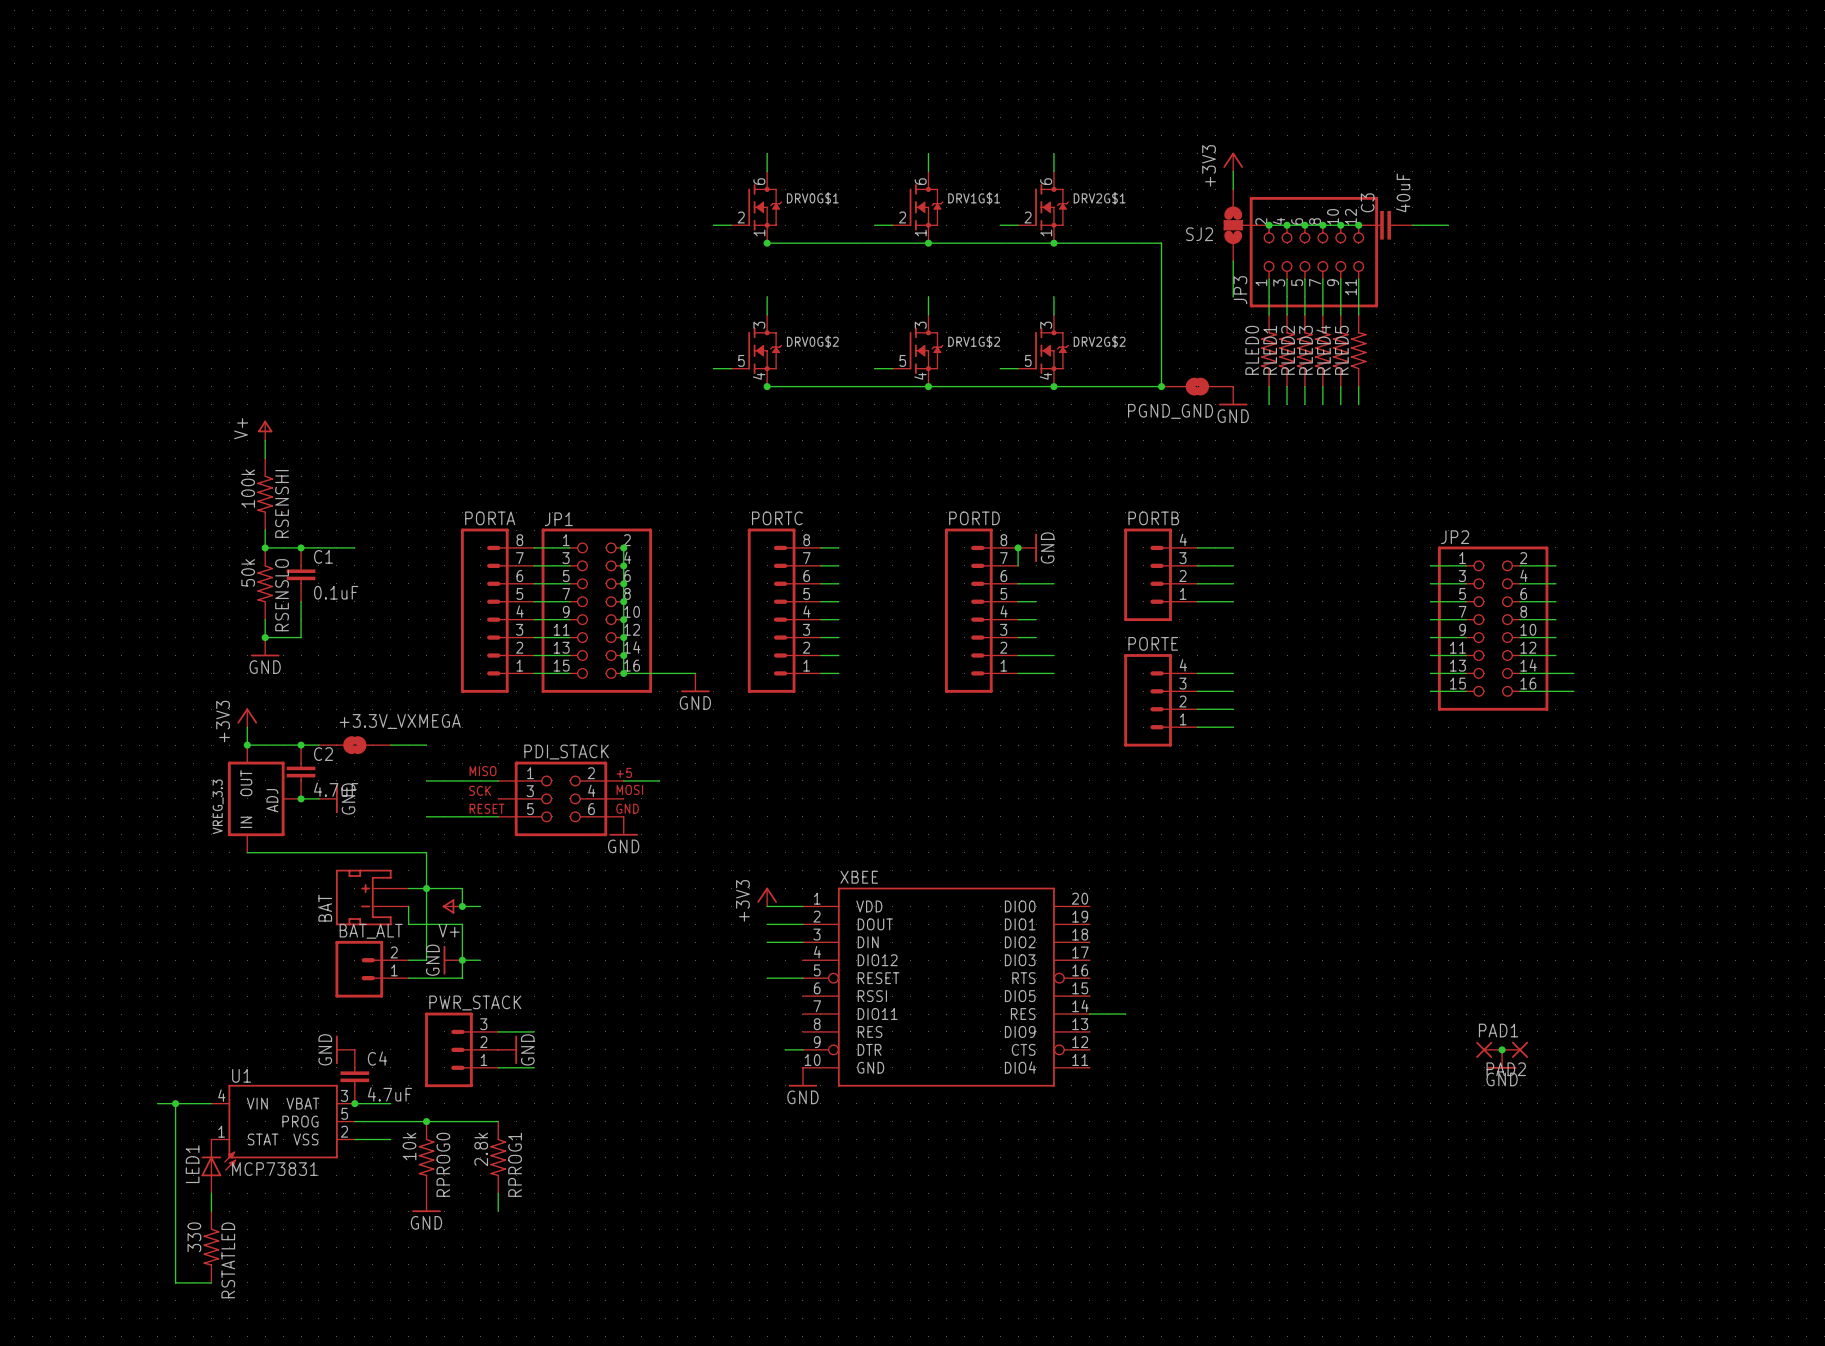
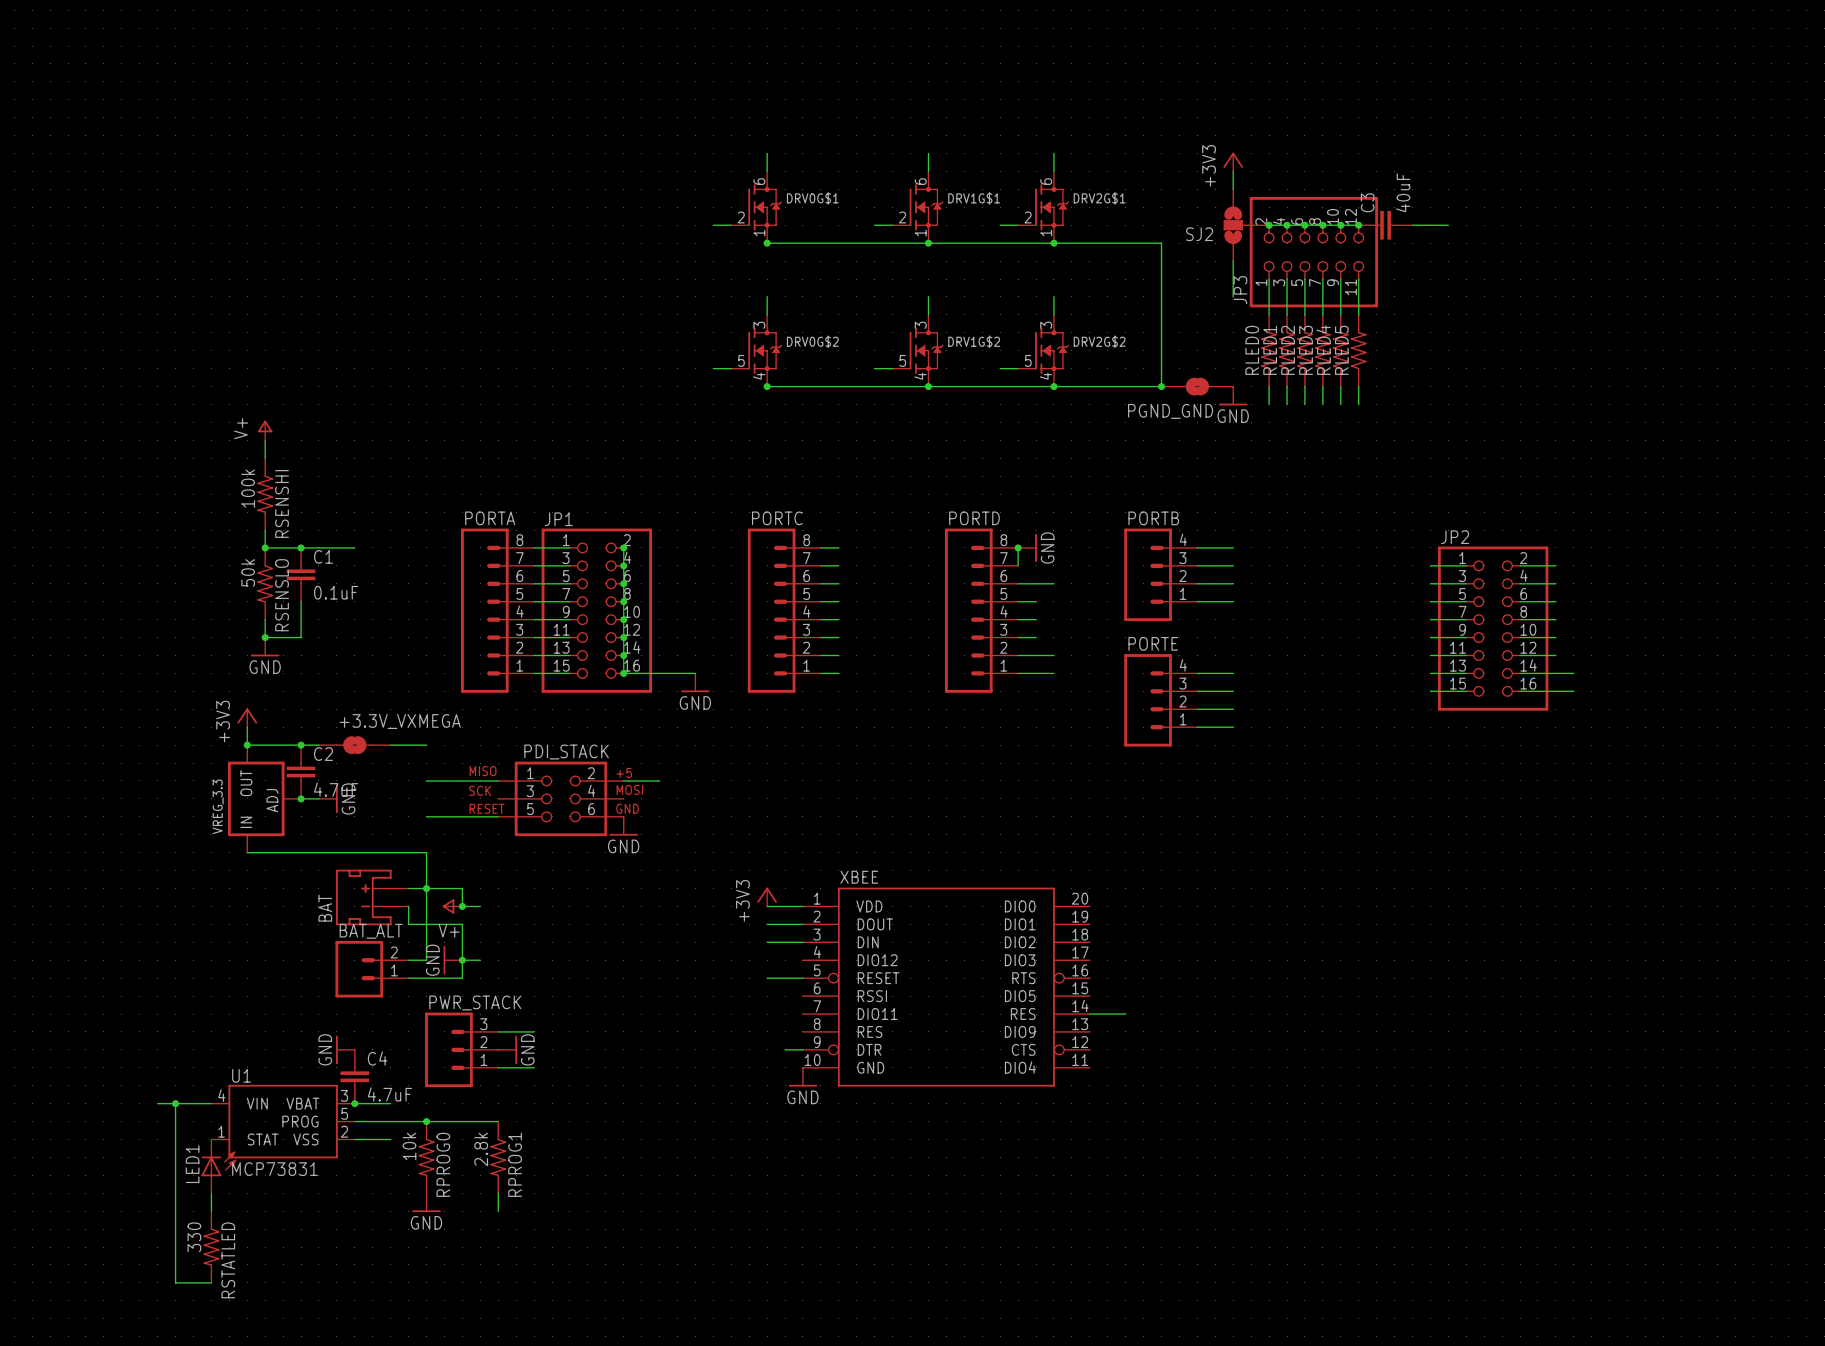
PAD1: (1489, 1049) -> none
junction: (1502, 1049) -> none
PAD2: (1515, 1049) -> none
power symbol: GND (1502, 1059) -> none

